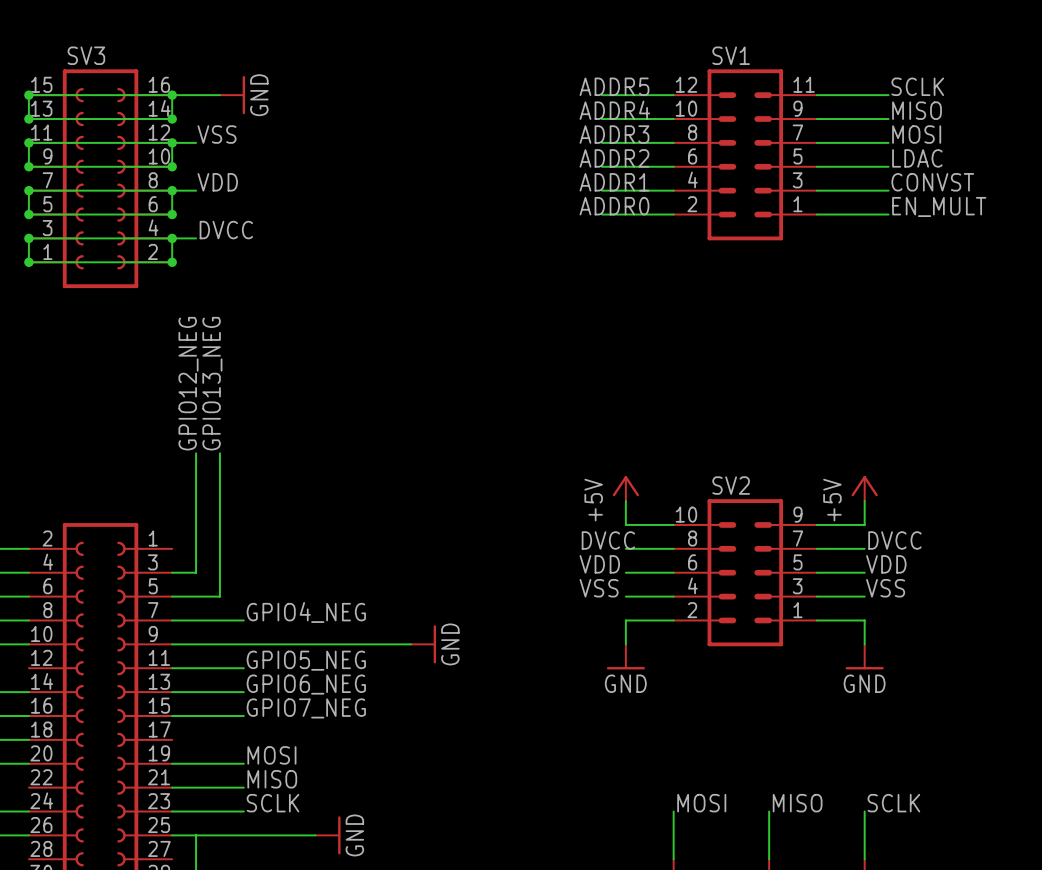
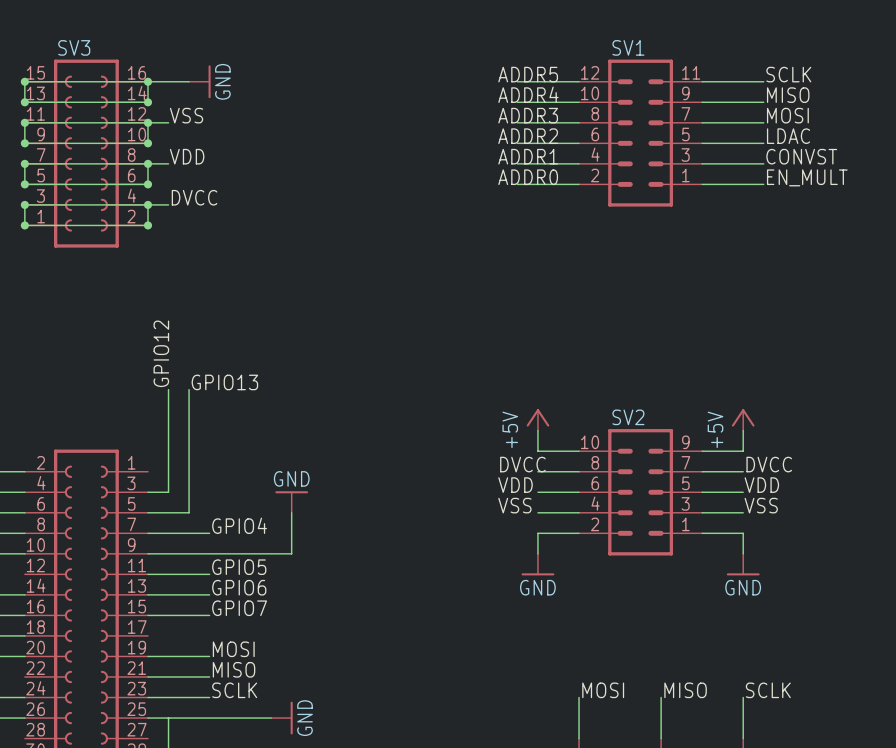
label: GPIO12_NEG (188, 383) -> GPIO12 (161, 353)
label: GPIO13_NEG (212, 383) -> GPIO13 (224, 382)
label: GPIO4_NEG (306, 612) -> GPIO4 (239, 525)
wire: (339, 644) (410, 644) -> (291, 553) (291, 512)
power symbol position: GND (423, 644) -> GND (291, 502)
power symbol rotation: 0° (434, 644) -> 90° counterclockwise (291, 492)
label: GPIO5_NEG (306, 660) -> GPIO5 (239, 567)
label: GPIO6_NEG (306, 684) -> GPIO6 (239, 587)
label: GPIO7_NEG (306, 708) -> GPIO7 (239, 608)

